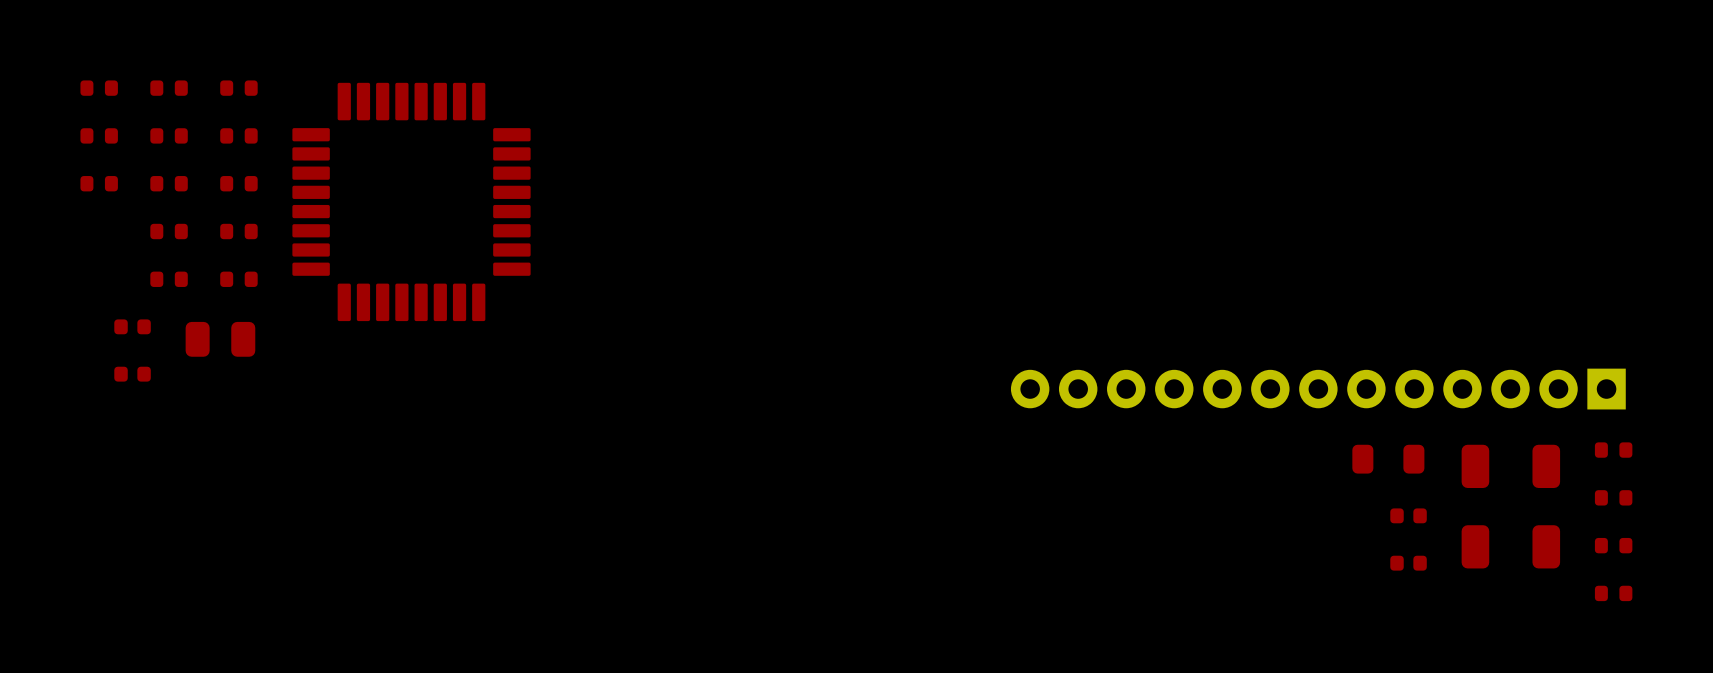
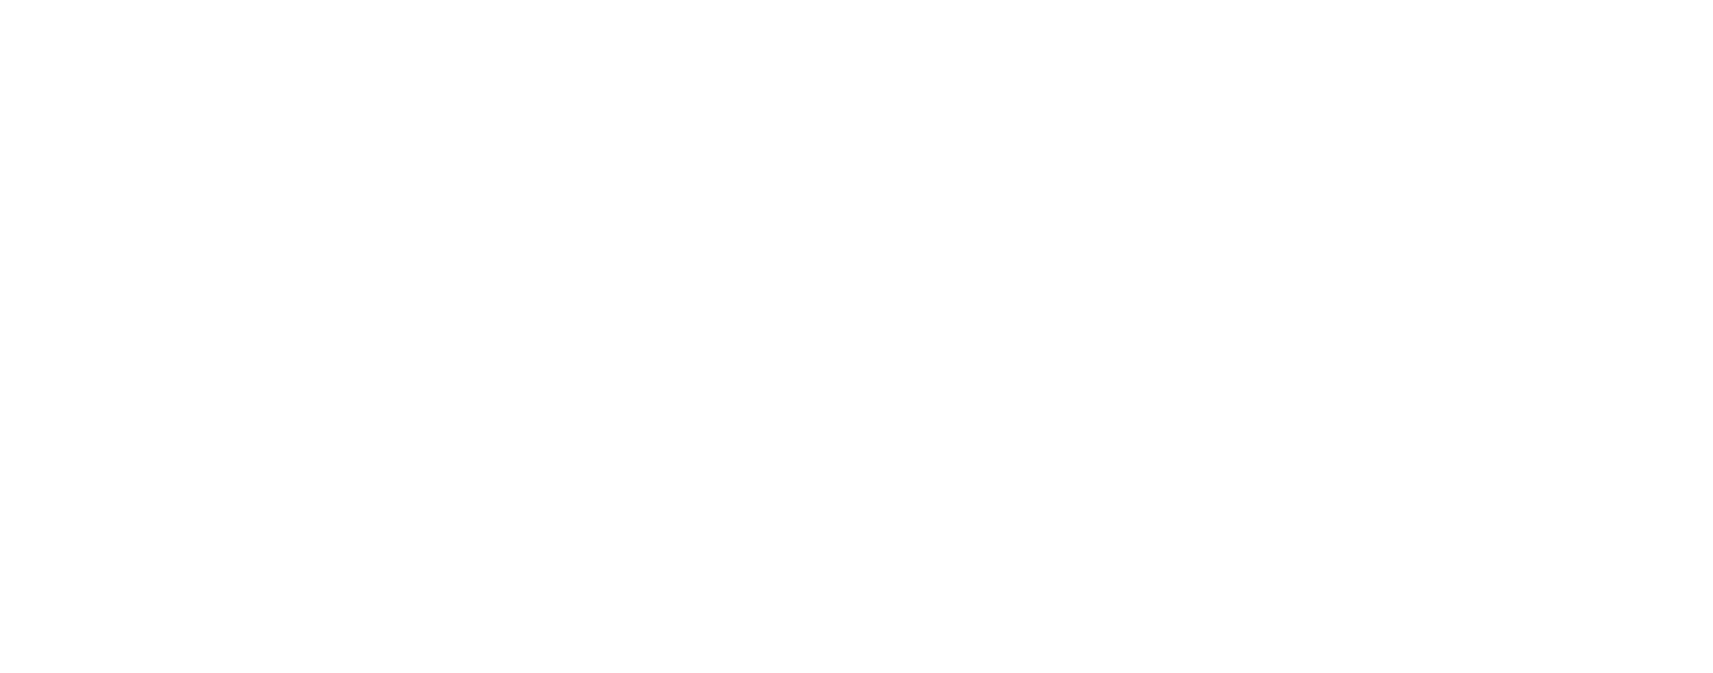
part: (99, 88) -> none
part: (169, 88) -> none
part: (238, 88) -> none
part: (99, 135) -> none
part: (169, 135) -> none
part: (238, 135) -> none
part: (99, 183) -> none
part: (169, 183) -> none
part: (238, 183) -> none
part: (411, 201) -> none
part: (169, 231) -> none
part: (238, 231) -> none
part: (169, 279) -> none
part: (238, 279) -> none
part: (132, 326) -> none
part: (220, 339) -> none
part: (132, 374) -> none
part: (1318, 389) -> none
part: (1613, 450) -> none
part: (1388, 459) -> none
part: (1510, 466) -> none
part: (1613, 497) -> none
part: (1408, 515) -> none
part: (1613, 545) -> none
part: (1510, 546) -> none
part: (1408, 563) -> none
part: (1613, 593) -> none

